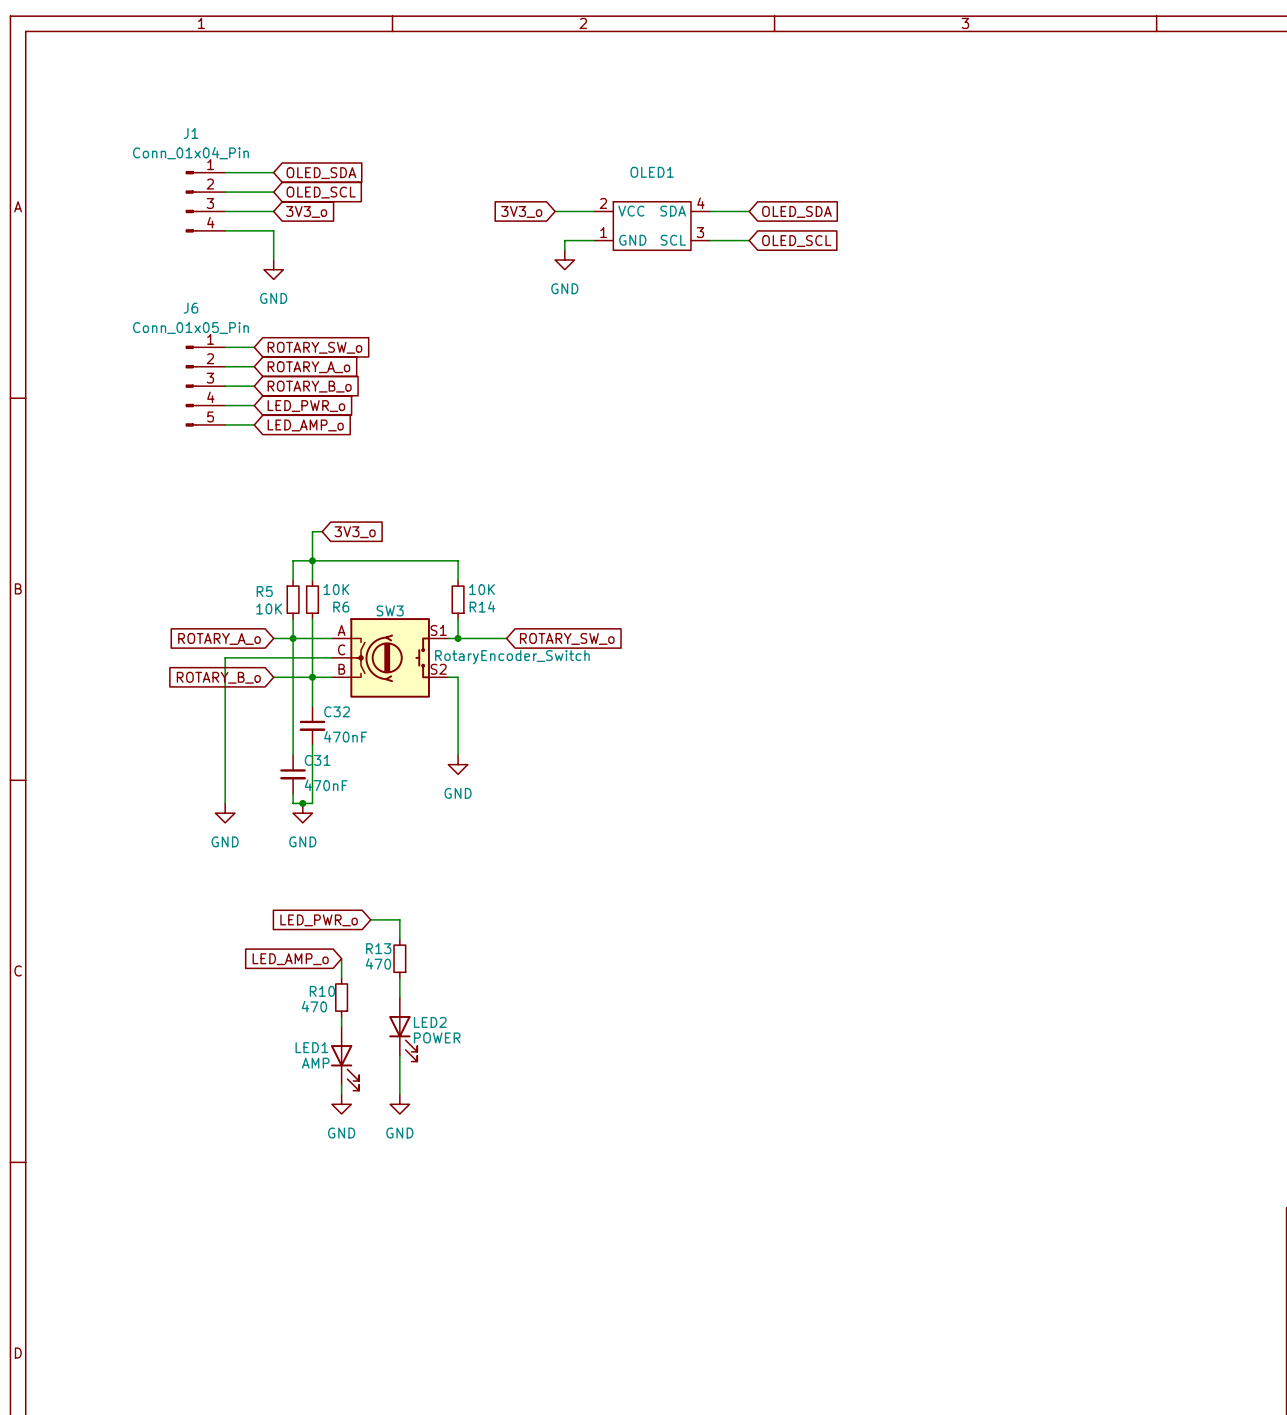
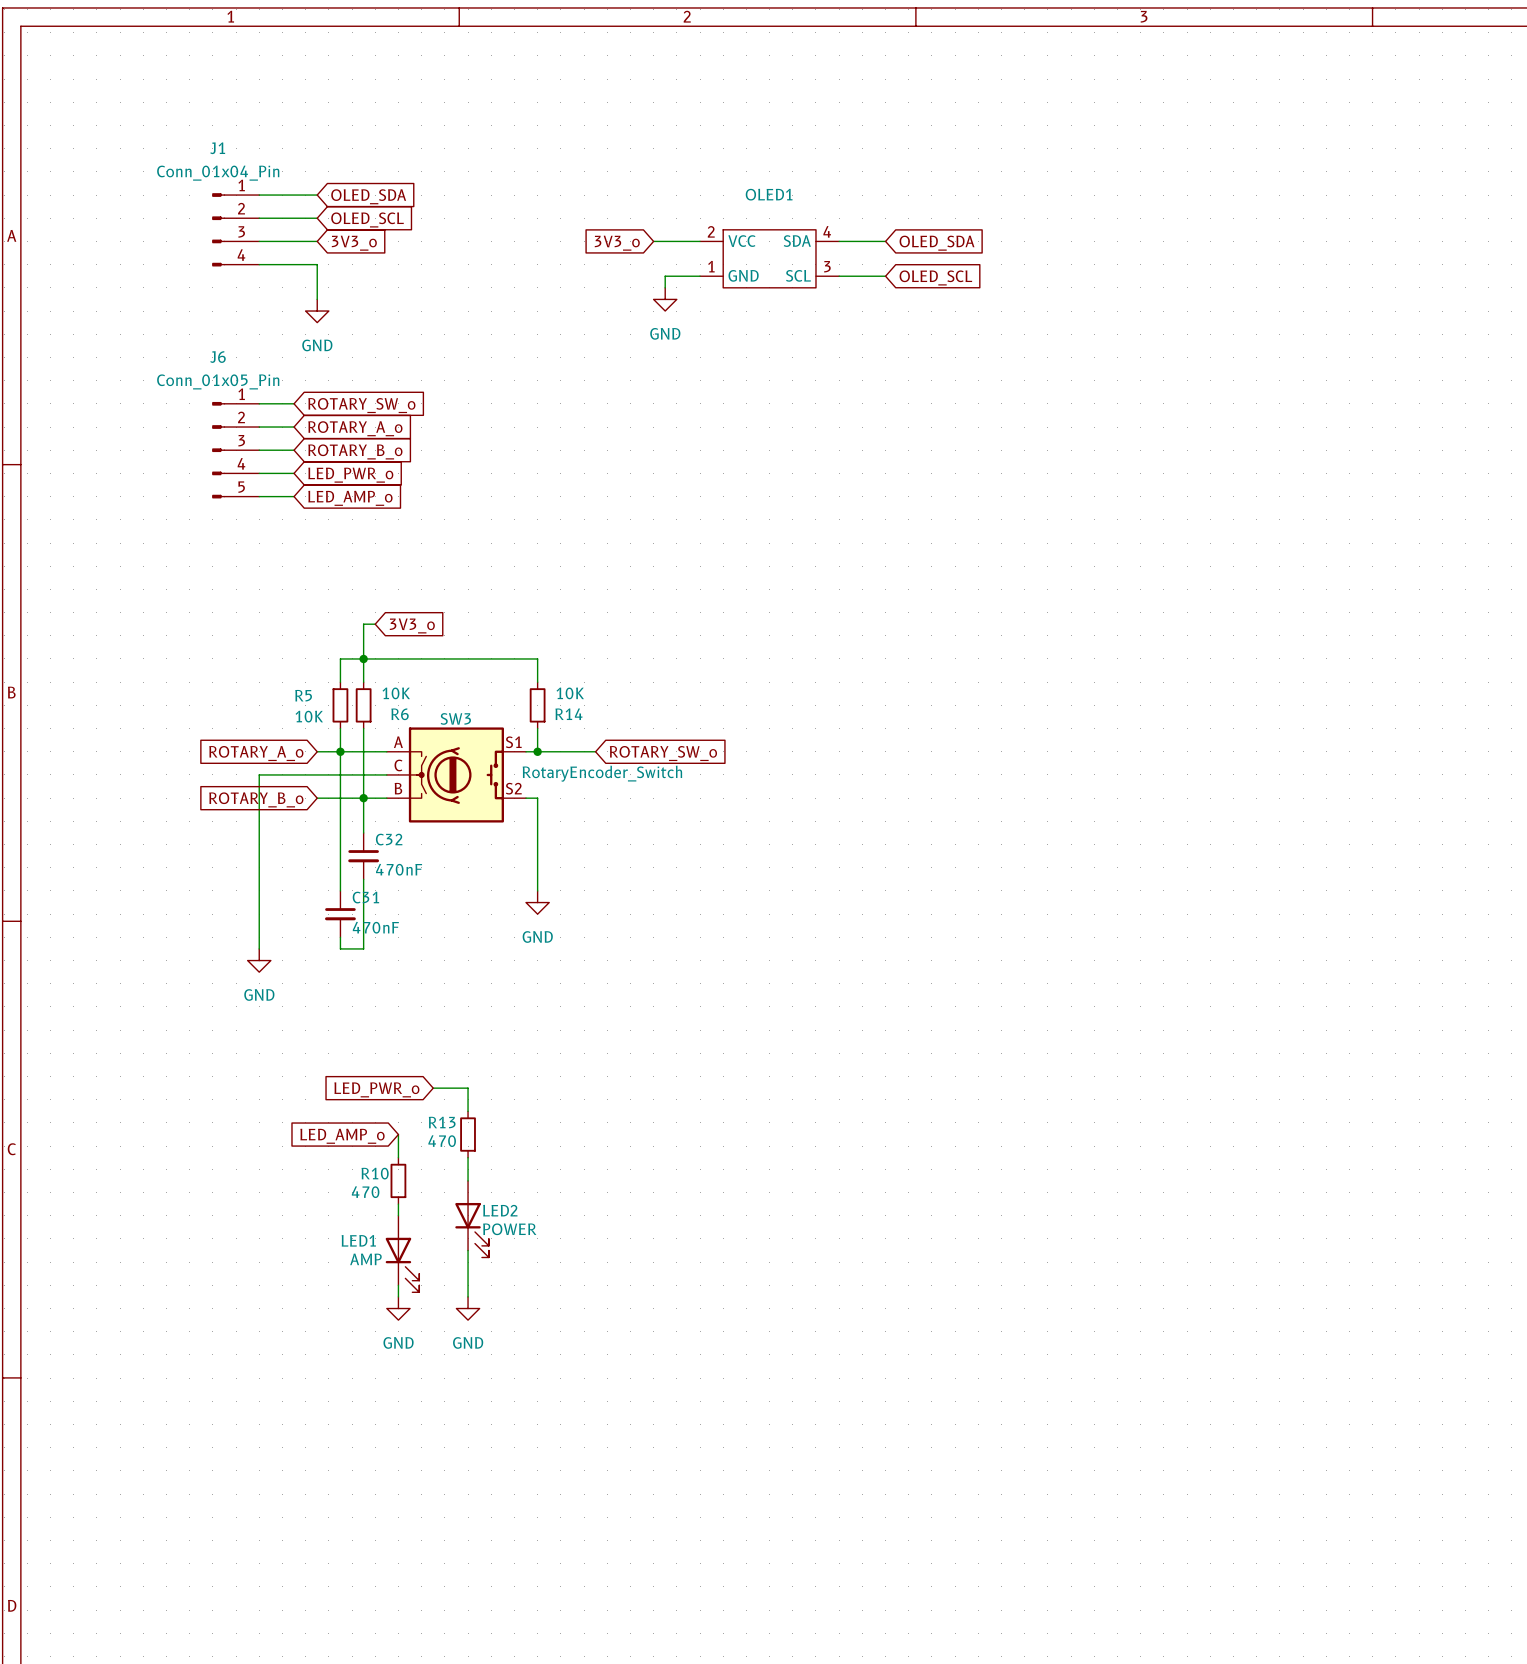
junction: (302, 803) -> none
power symbol: GND (302, 813) -> none

